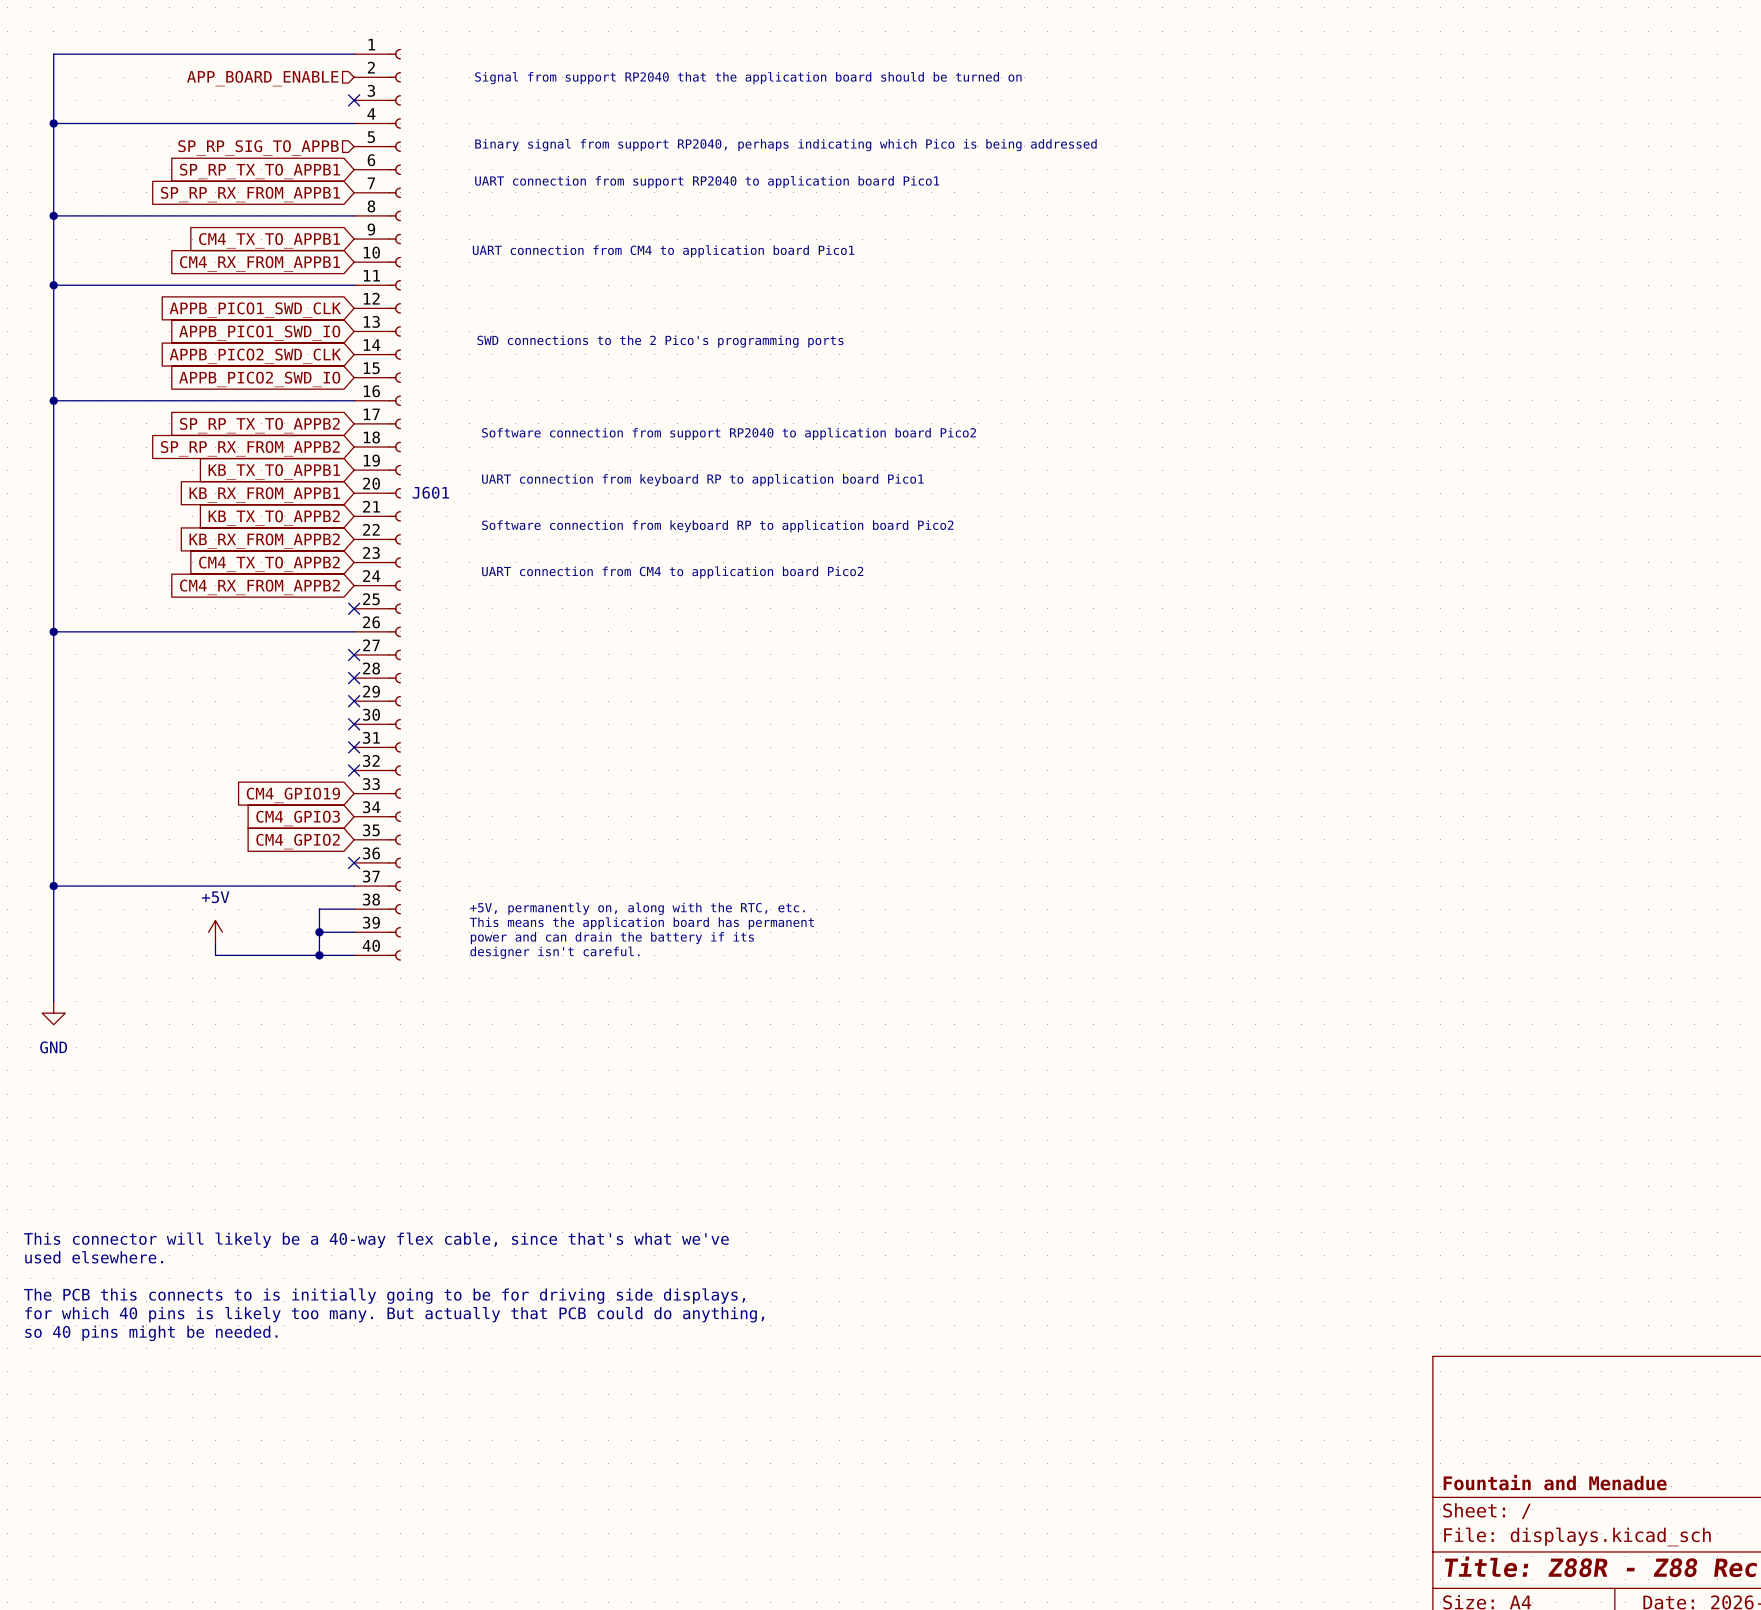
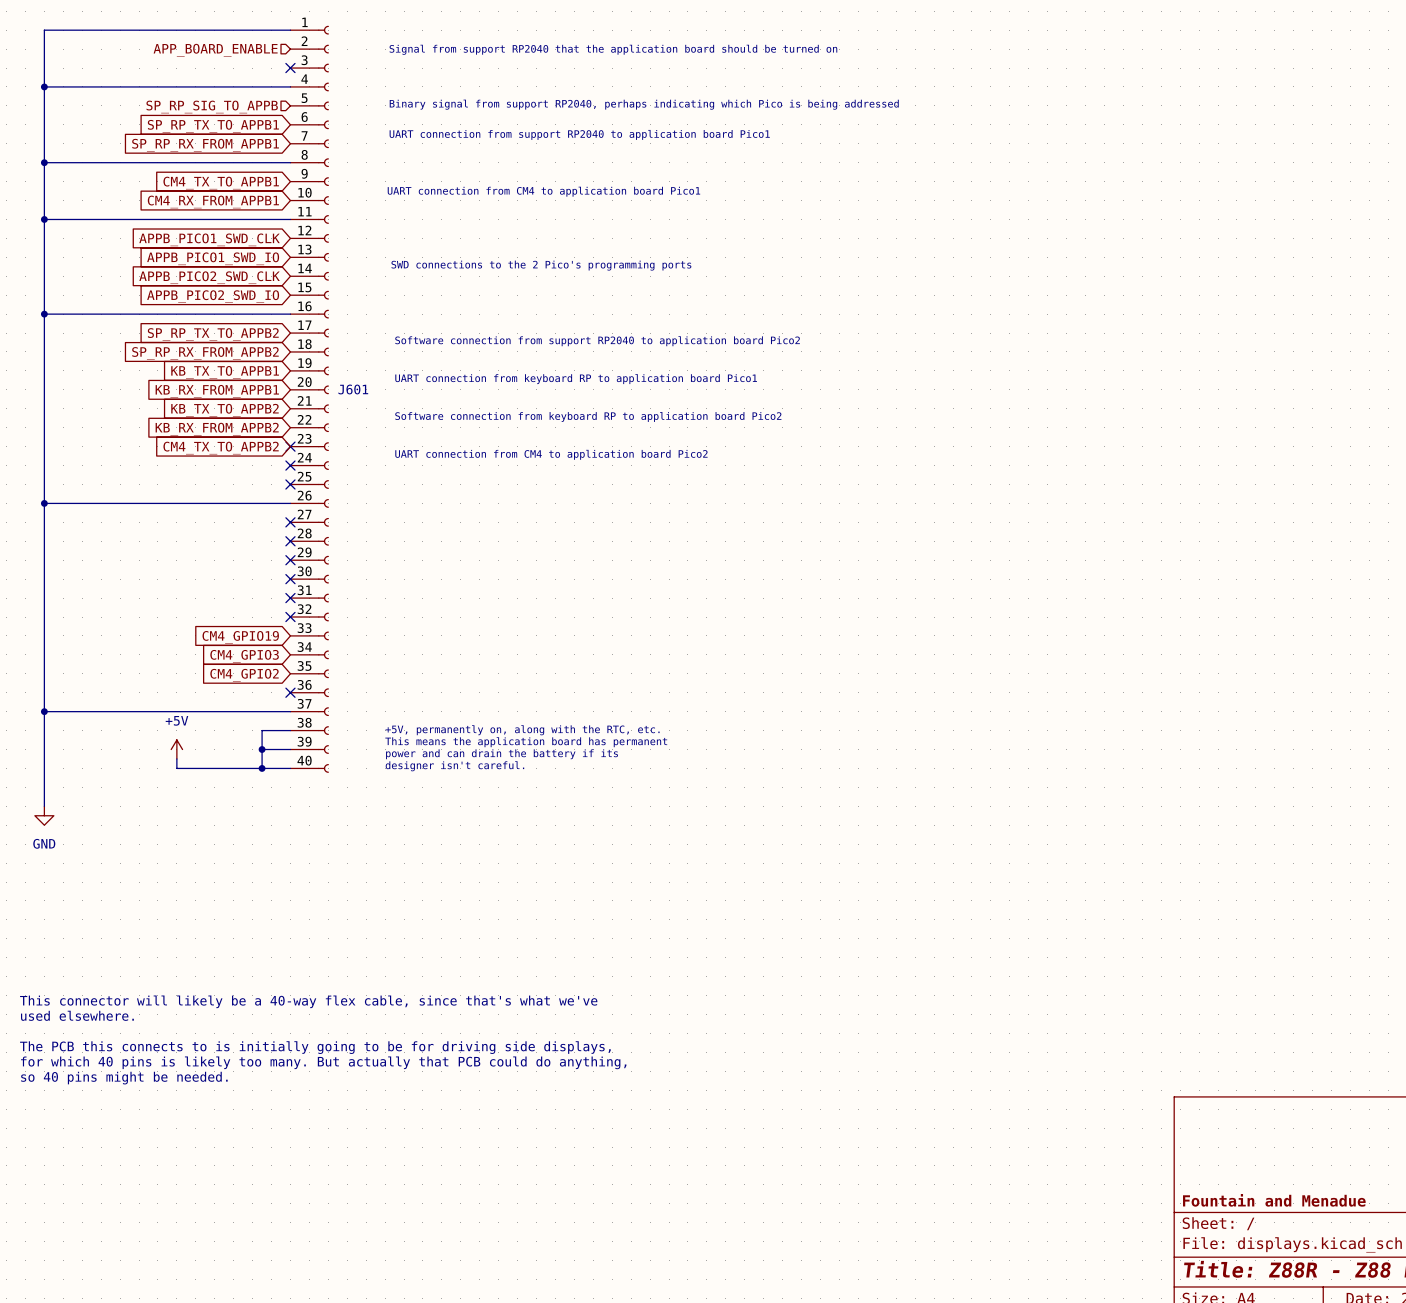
no-connect mark: none -> (290, 446)
no-connect mark: none -> (290, 465)
global label: CM4_RX_FROM_APPB2 (259, 587) -> none

